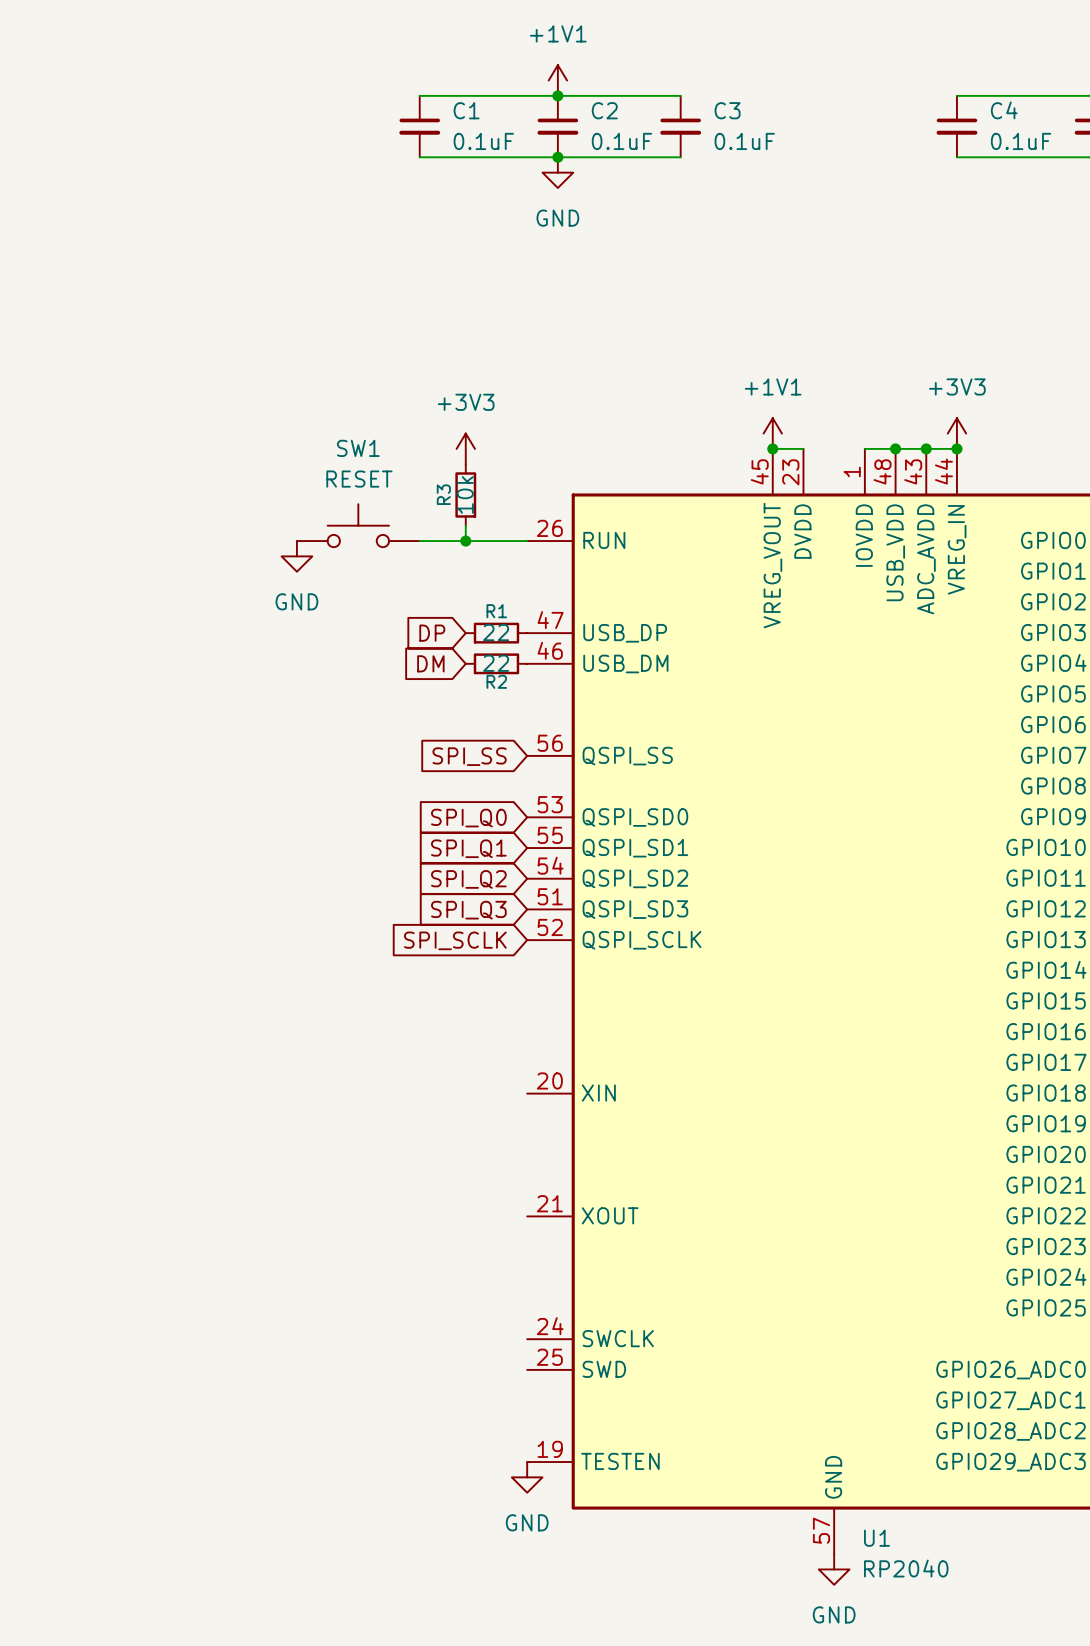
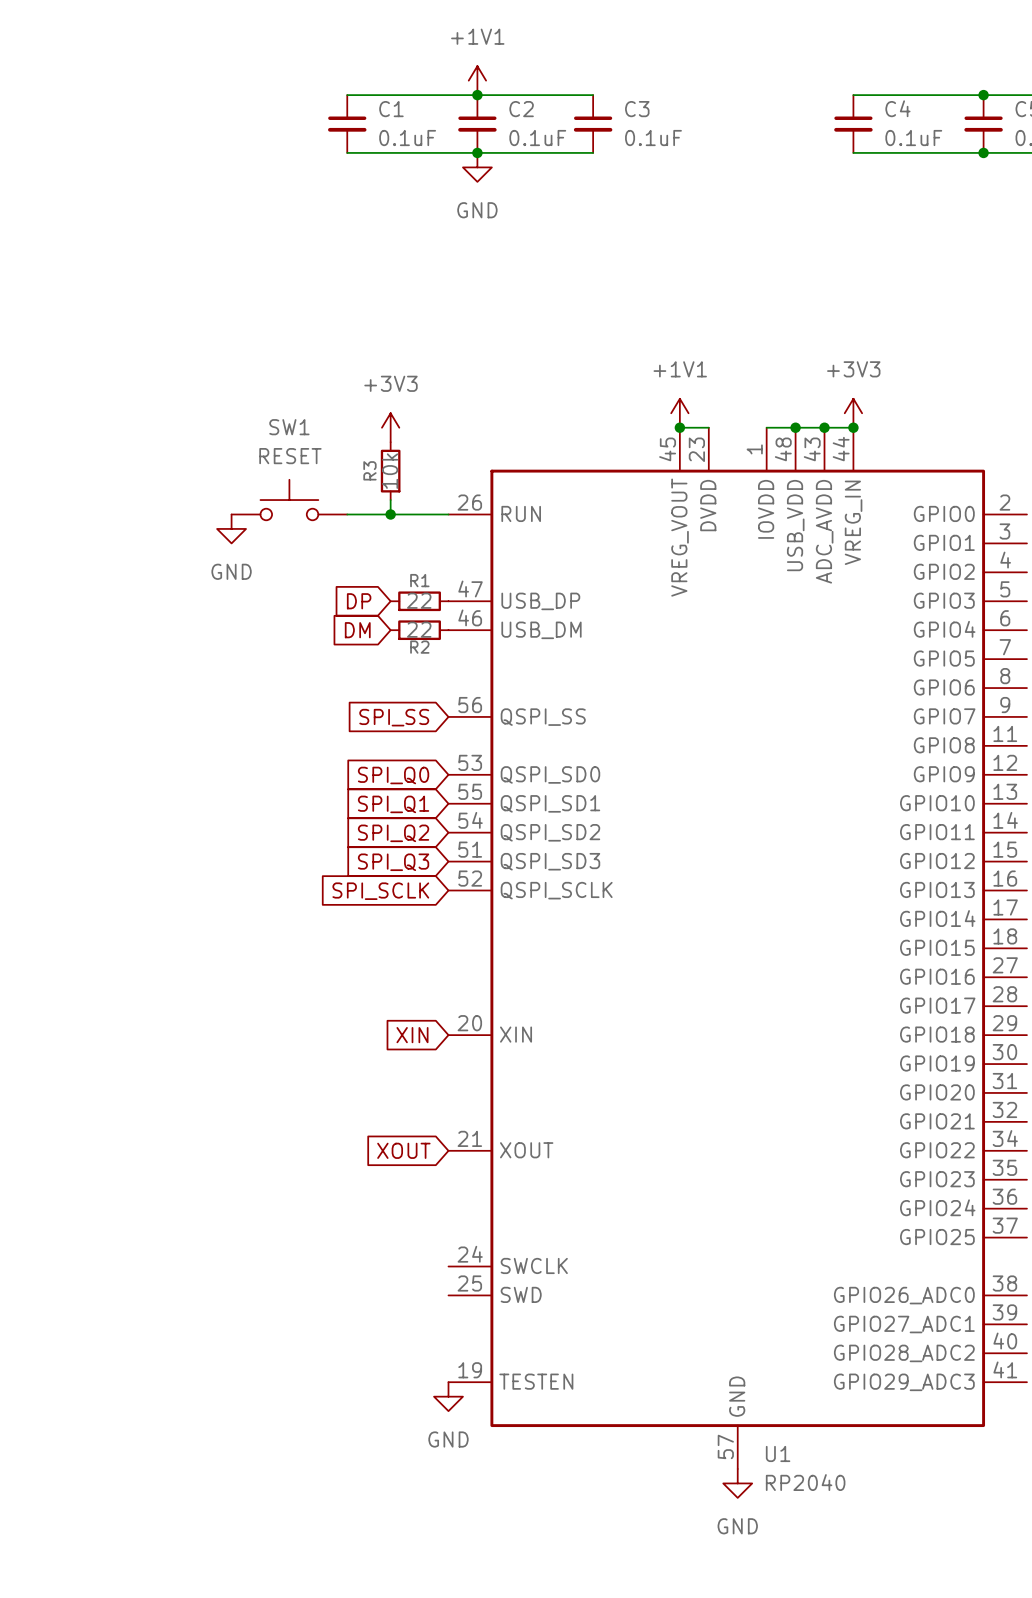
global label: none -> XIN (412, 1035)
global label: none -> XOUT (403, 1150)

